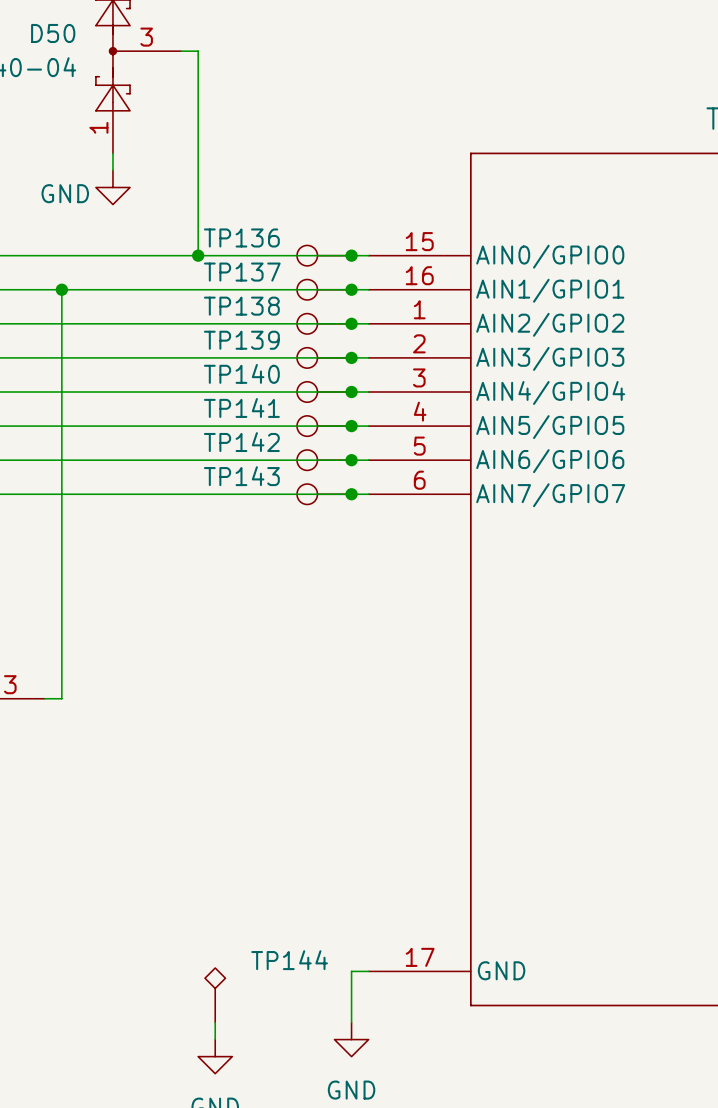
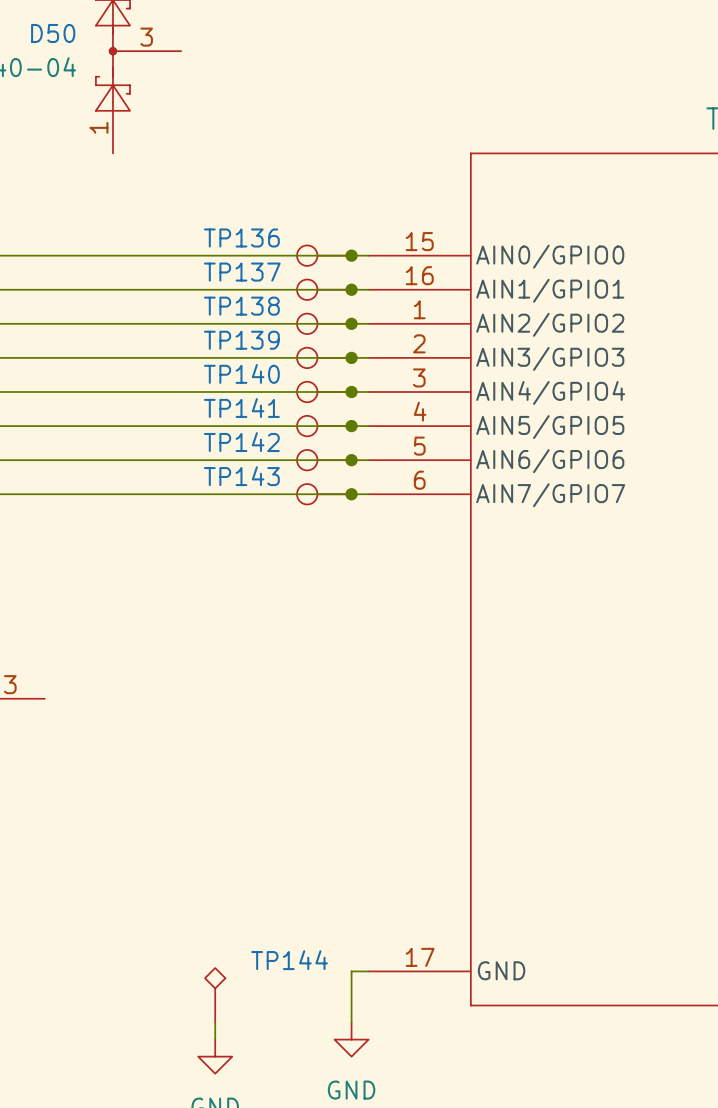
wire: (181, 51) (198, 51) (198, 255) -> none
wire: (112, 153) (112, 170) -> none
power symbol: GND (112, 187) -> none
junction: (198, 255) -> none
wire: (61, 289) (61, 698) (44, 698) -> none
junction: (61, 289) -> none

